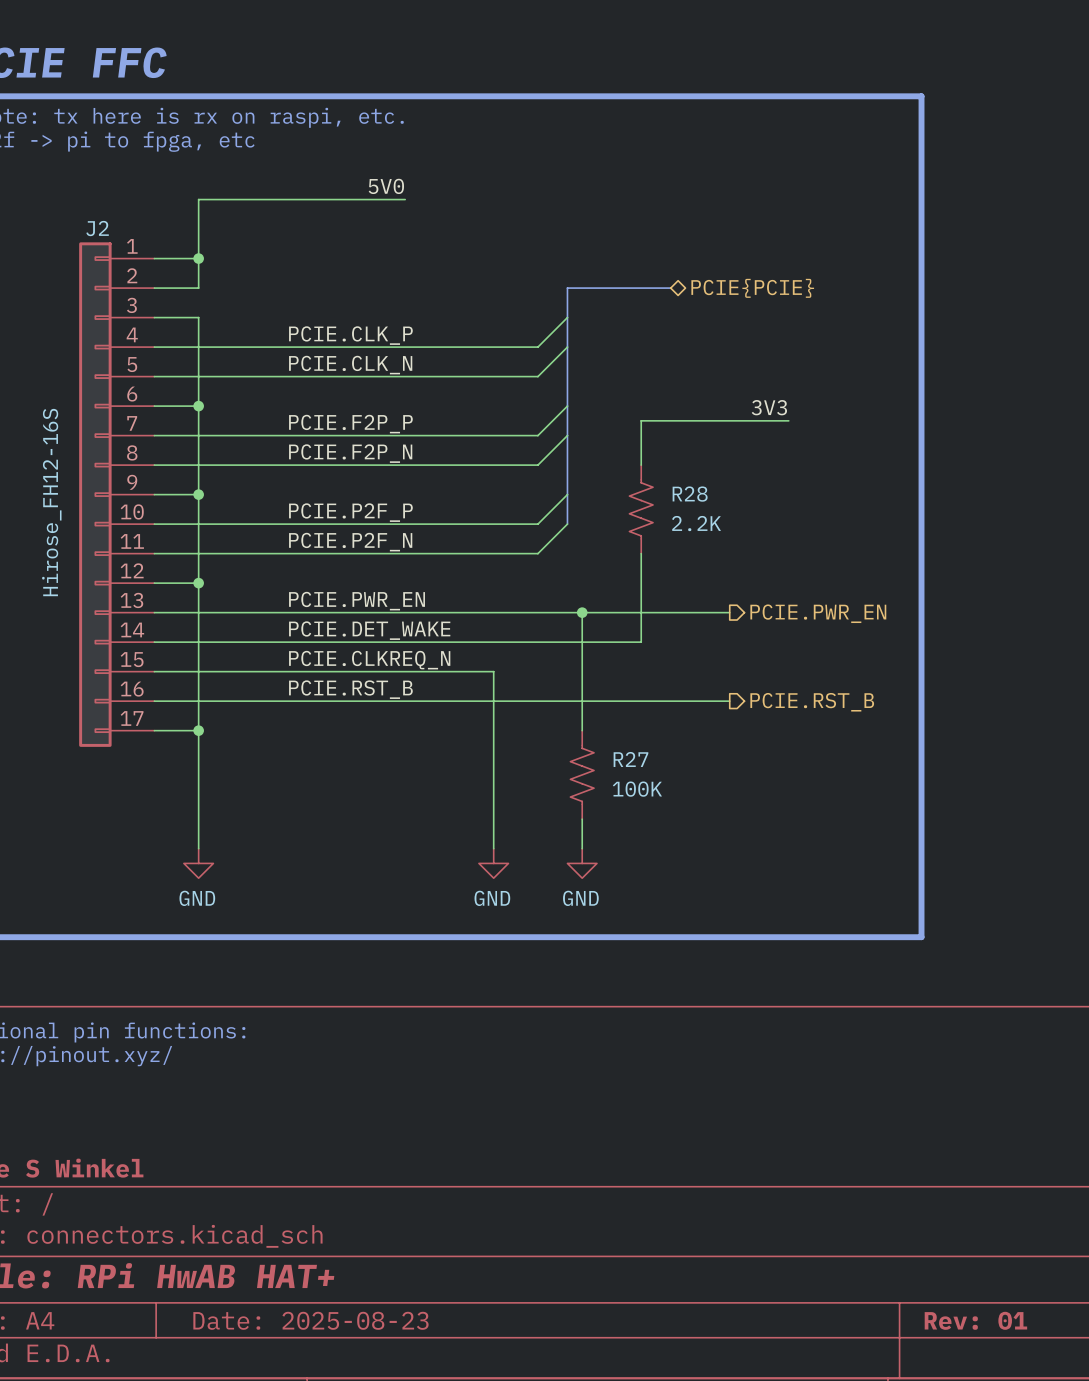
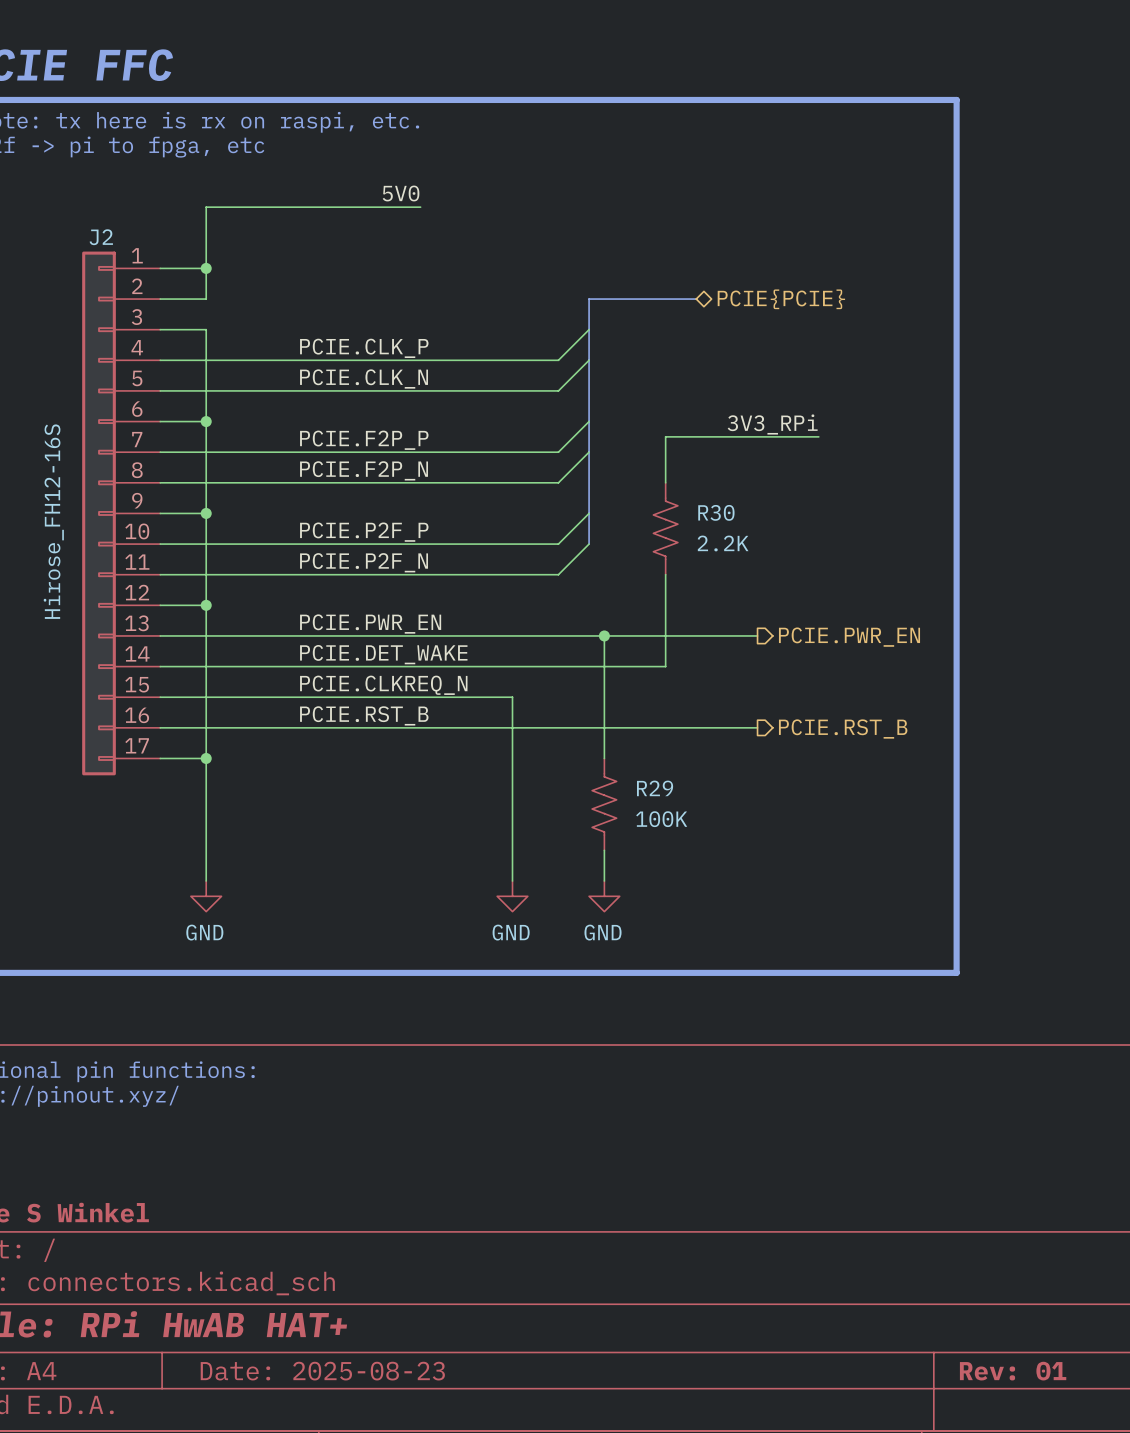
label: 3V3 (769, 407) -> 3V3_RPi (772, 424)
R28 name: R28 (690, 494) -> R30 (716, 512)
R27 name: R27 (630, 759) -> R29 (655, 788)

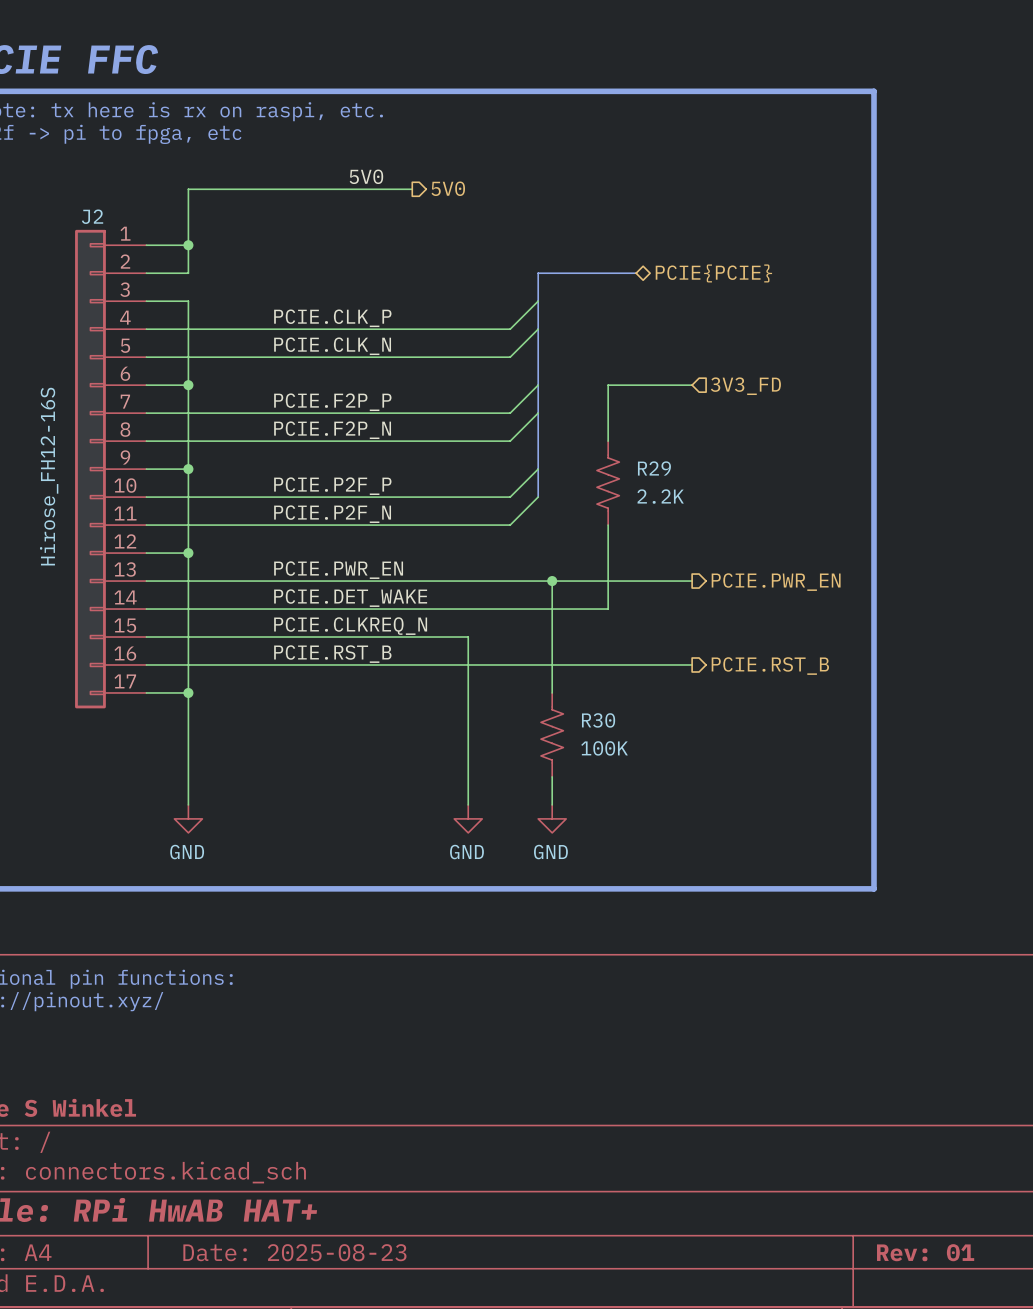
hierarchical label: none -> 5V0 (448, 188)
wire: none -> (384, 189) (412, 189)
hierarchical label: none -> 3V3_FD (745, 386)
label: 3V3_RPi (772, 424) -> none
wire: (665, 436) (818, 436) -> (608, 399) (608, 385) (692, 385)
R30 name: R30 (716, 512) -> R29 (654, 468)
R29 name: R29 (655, 788) -> R30 (598, 720)

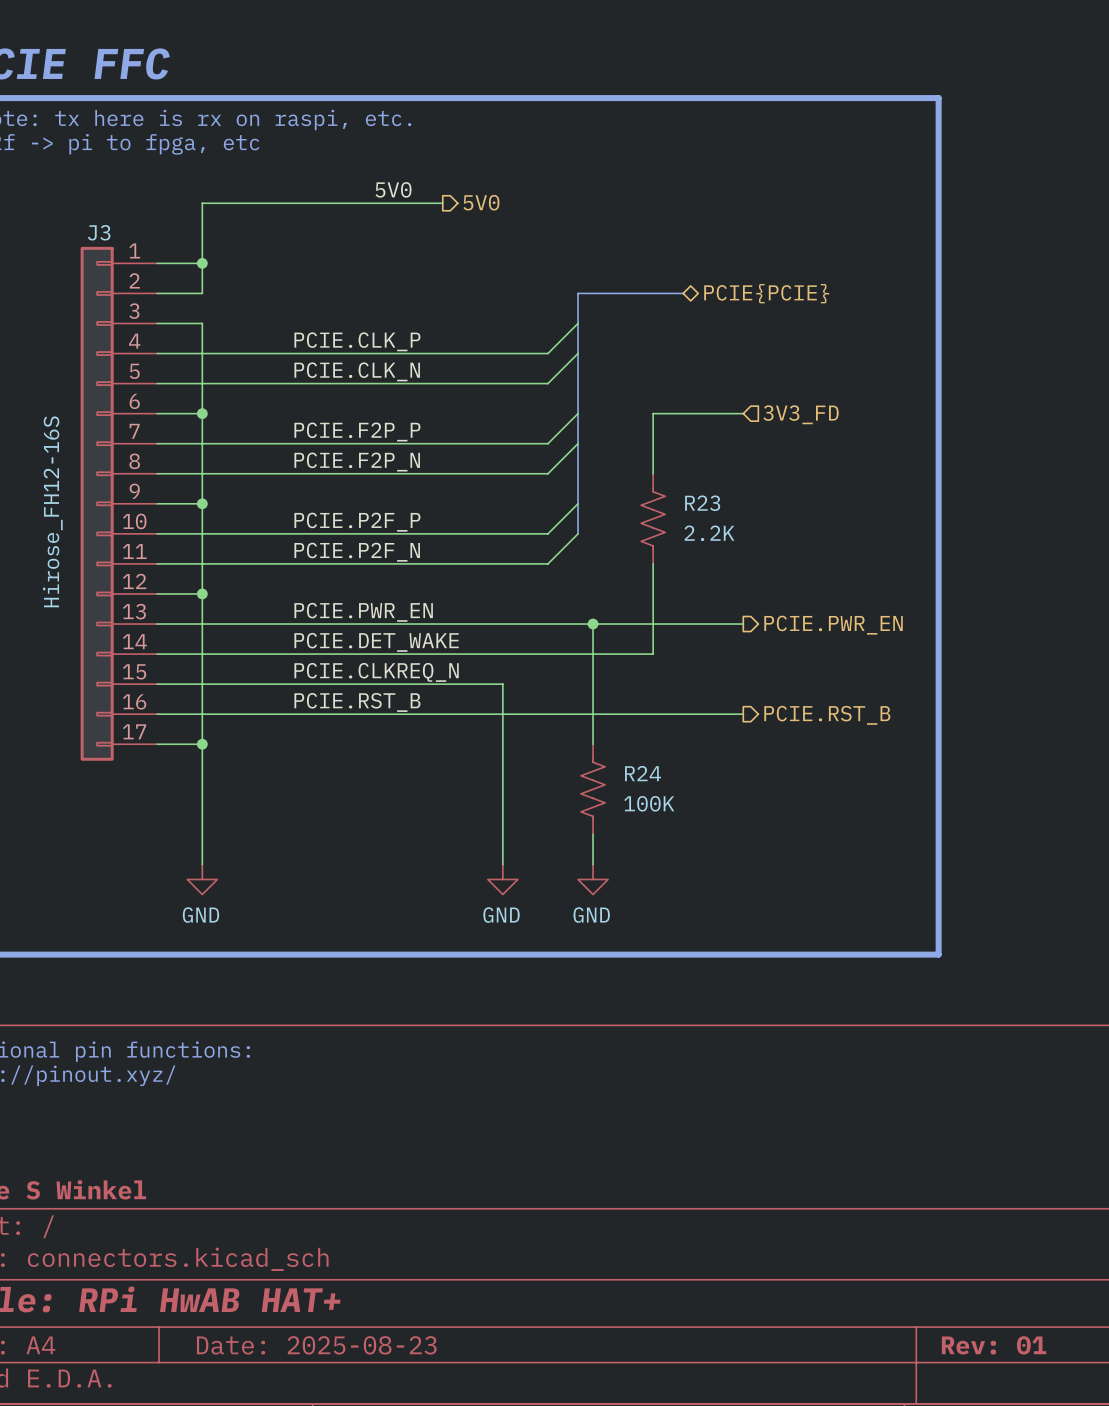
J2 name: J2 (92, 216) -> J3 (99, 232)
R29 name: R29 (654, 468) -> R23 (702, 503)
R30 name: R30 (598, 720) -> R24 (643, 773)

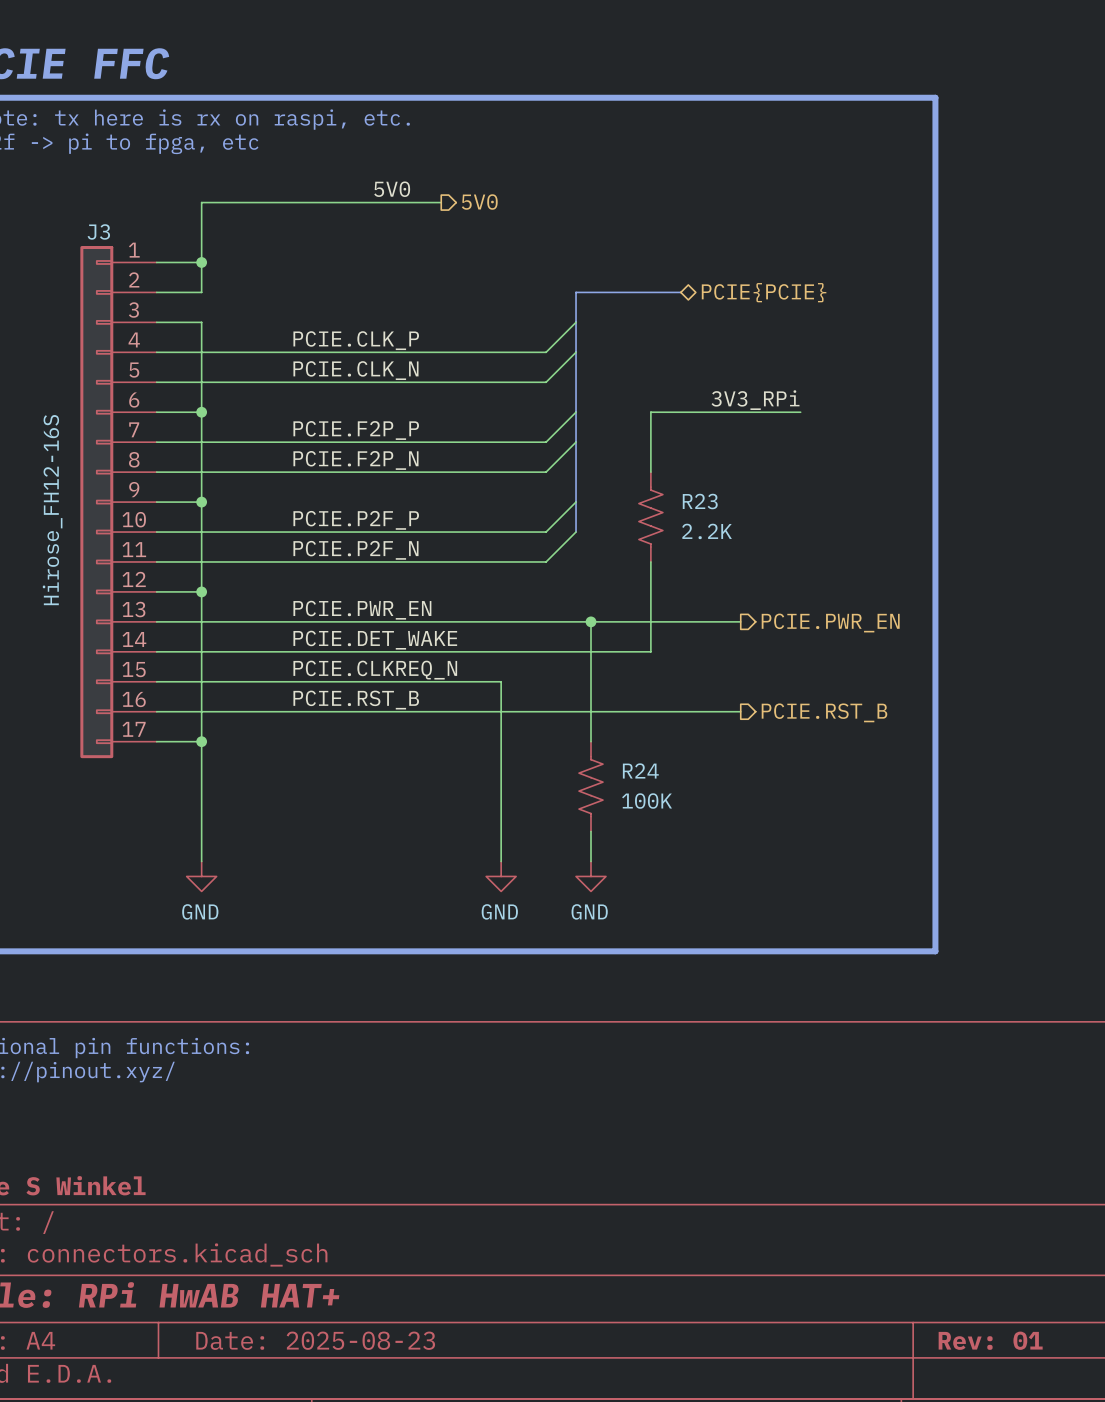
label: none -> 3V3_RPi (755, 400)
wire: none -> (740, 412) (800, 412)
hierarchical label: 3V3_FD (801, 414) -> none

